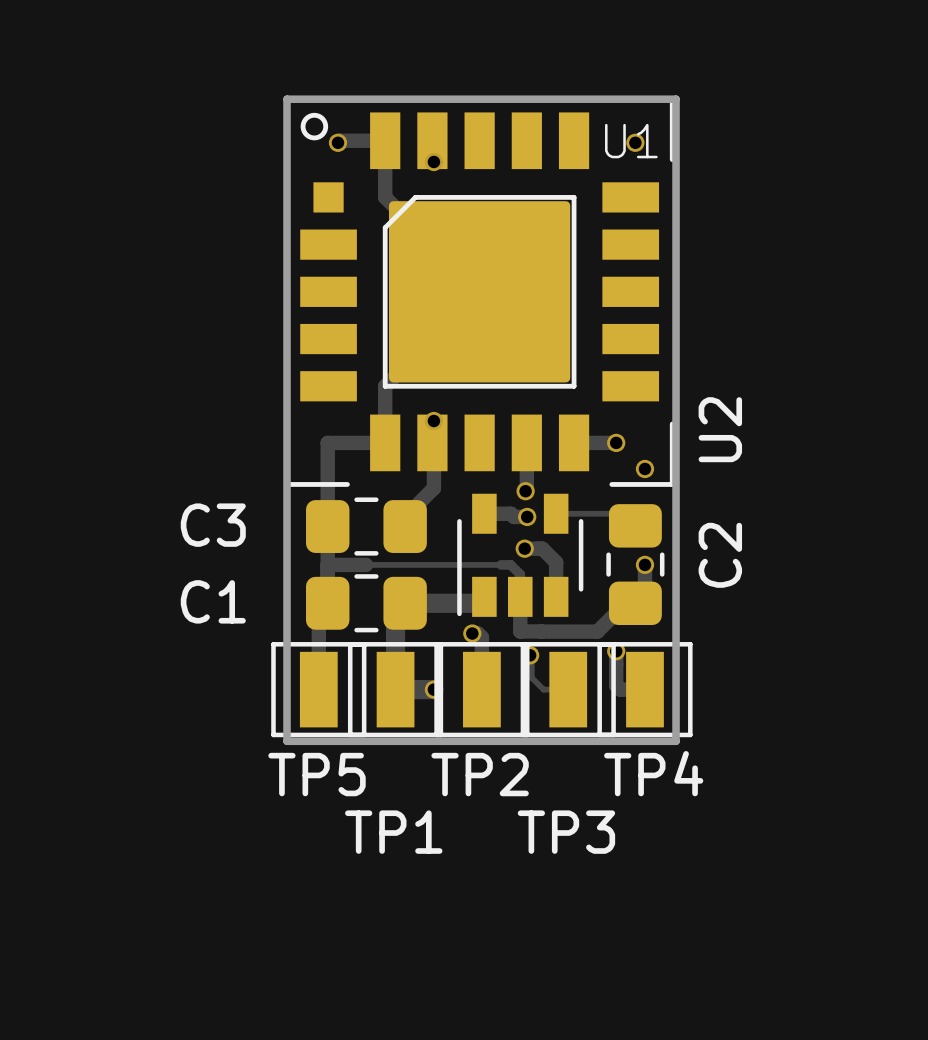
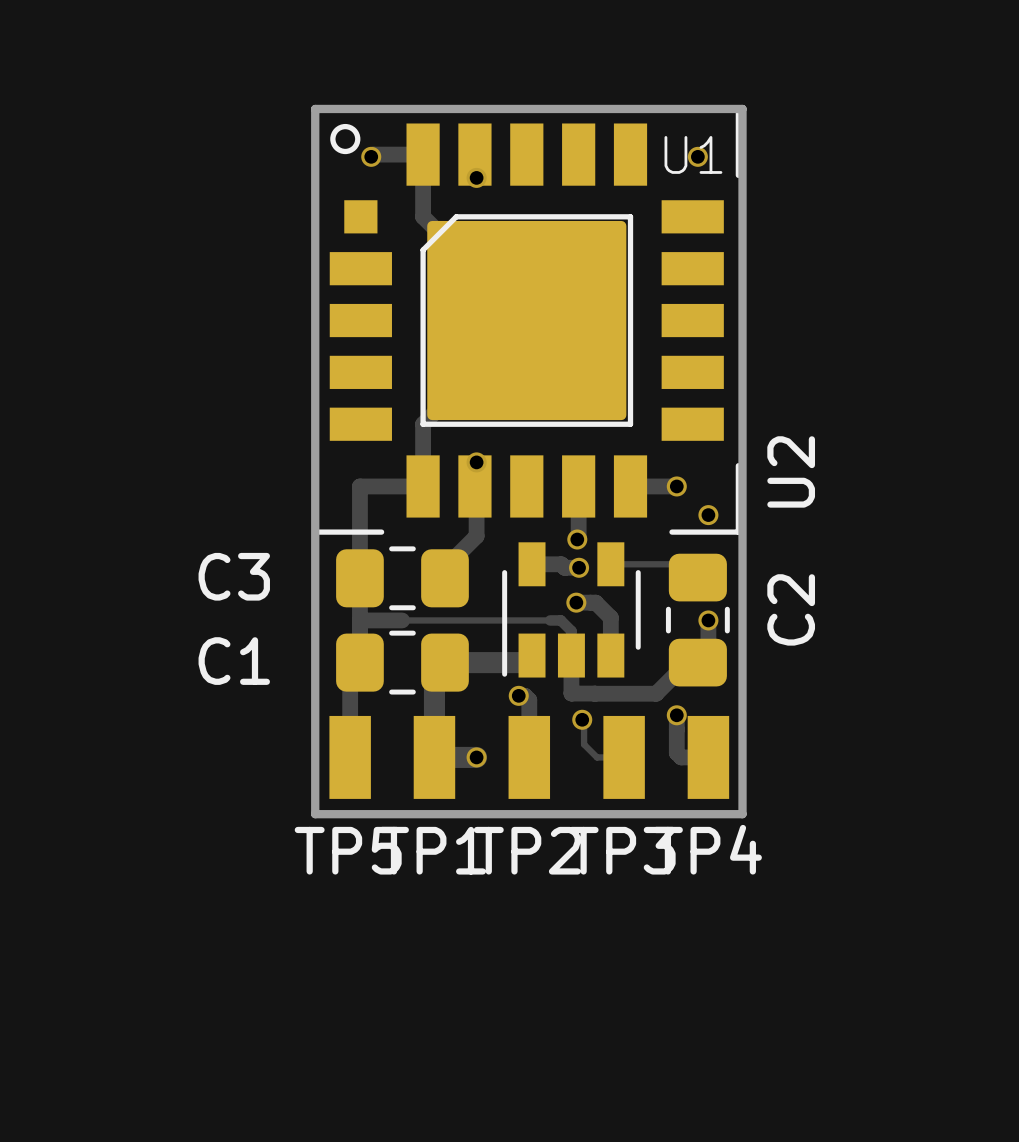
TP5 footprint: [271, 642, 367, 738] -> [329, 715, 371, 799]
TP1 footprint: [347, 642, 444, 738] -> [413, 715, 456, 799]
TP2 footprint: [434, 642, 530, 738] -> [508, 715, 551, 799]
TP3 footprint: [520, 642, 616, 738] -> [603, 715, 645, 799]
TP4 footprint: [597, 642, 693, 738] -> [687, 715, 730, 799]

